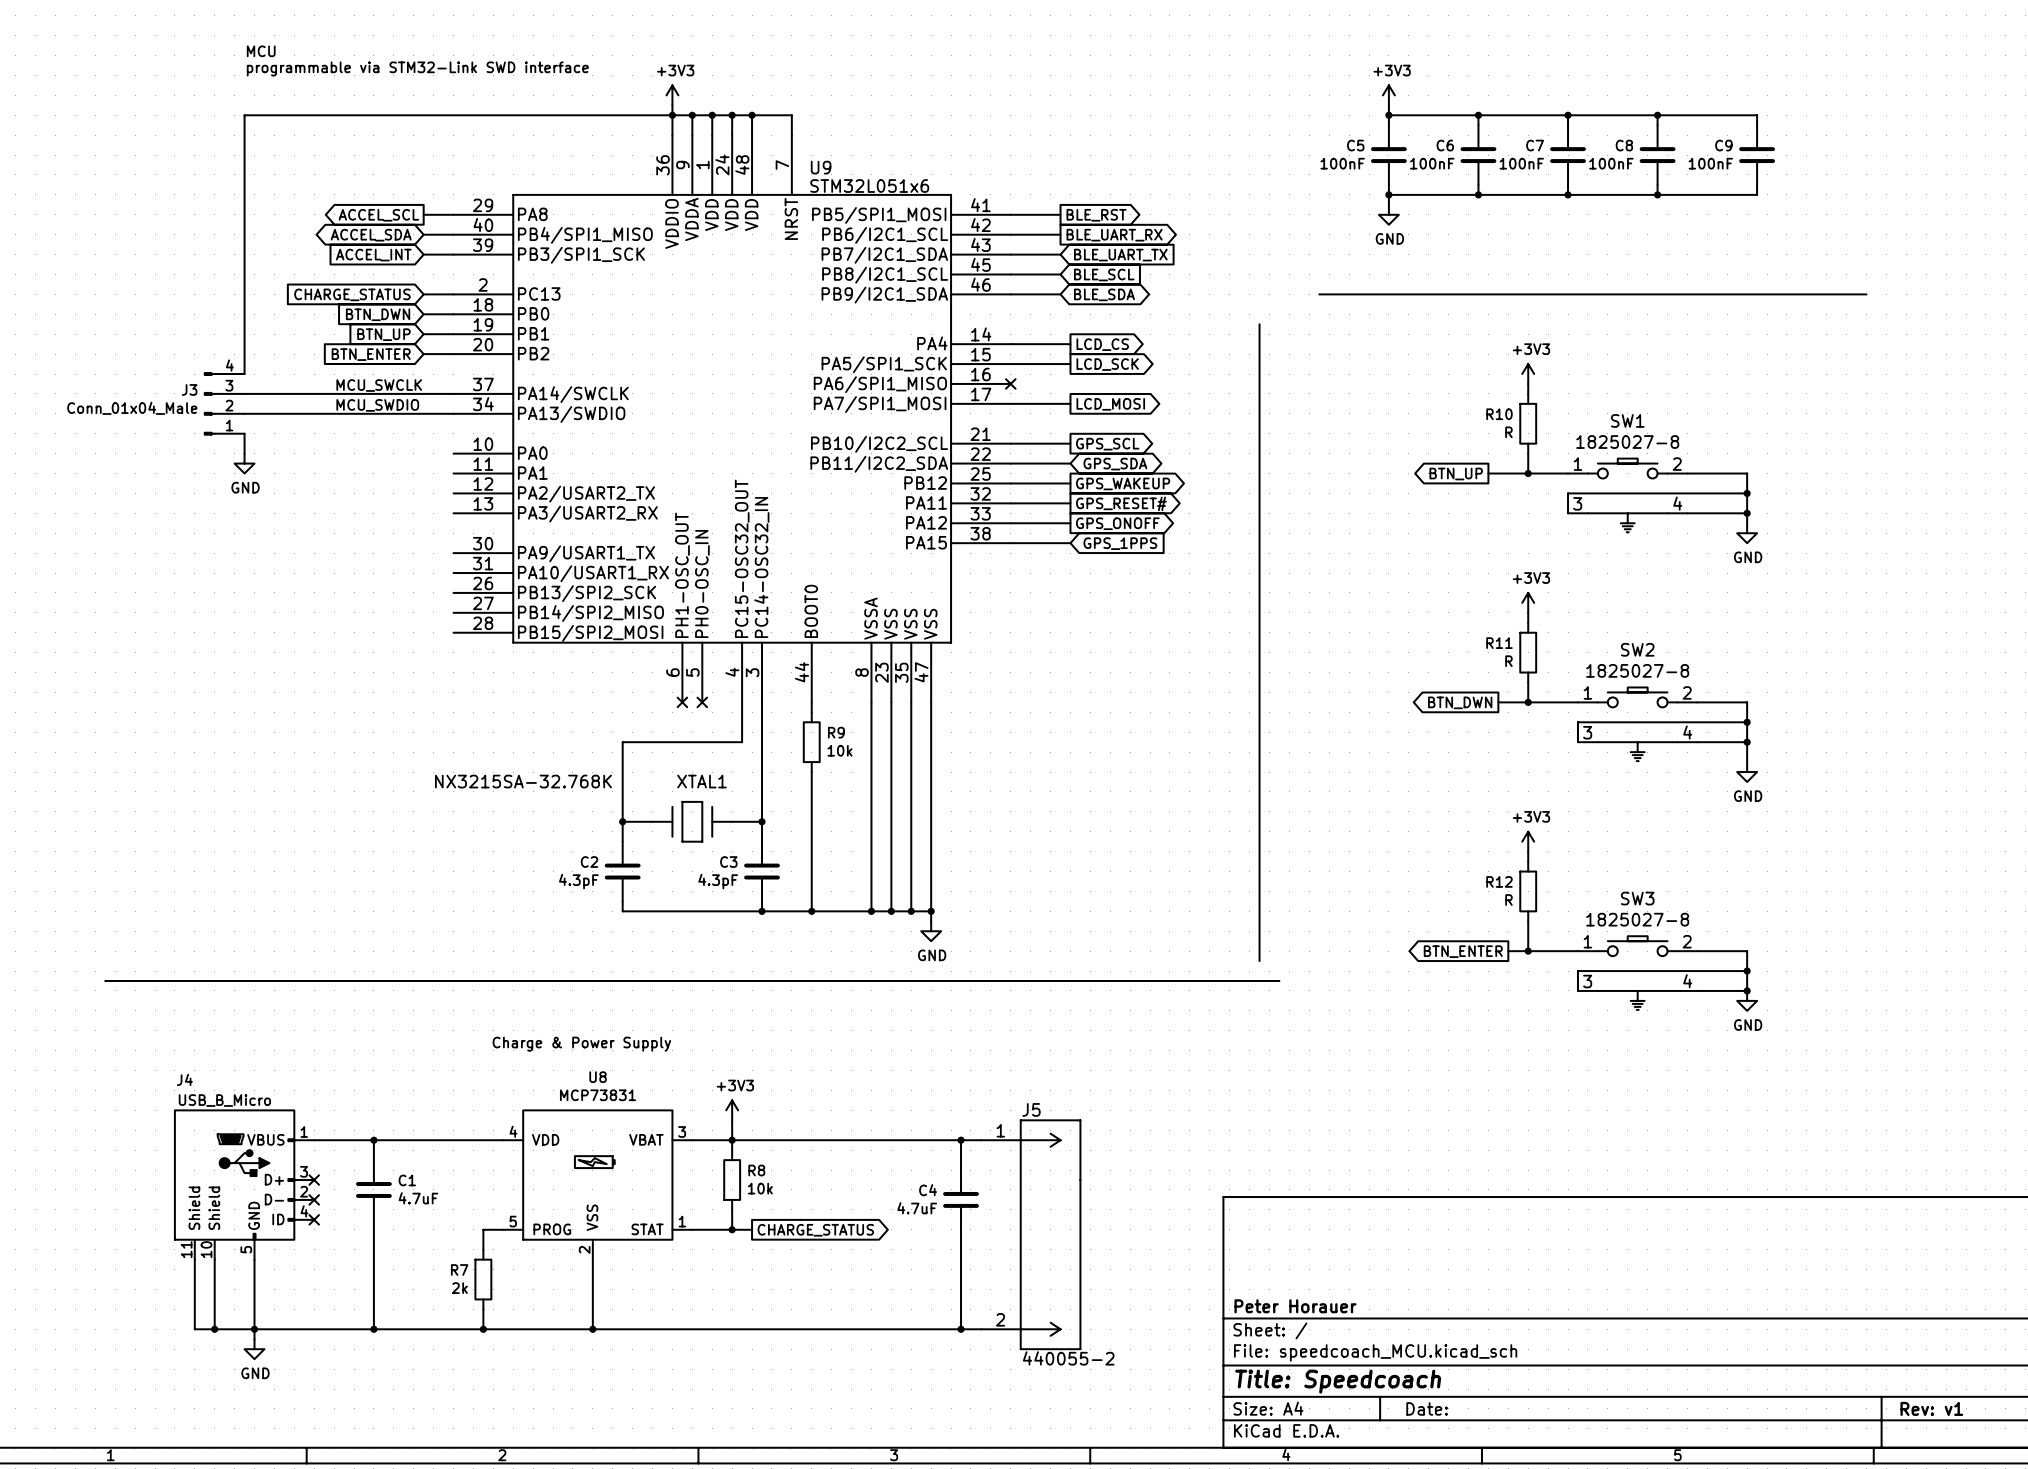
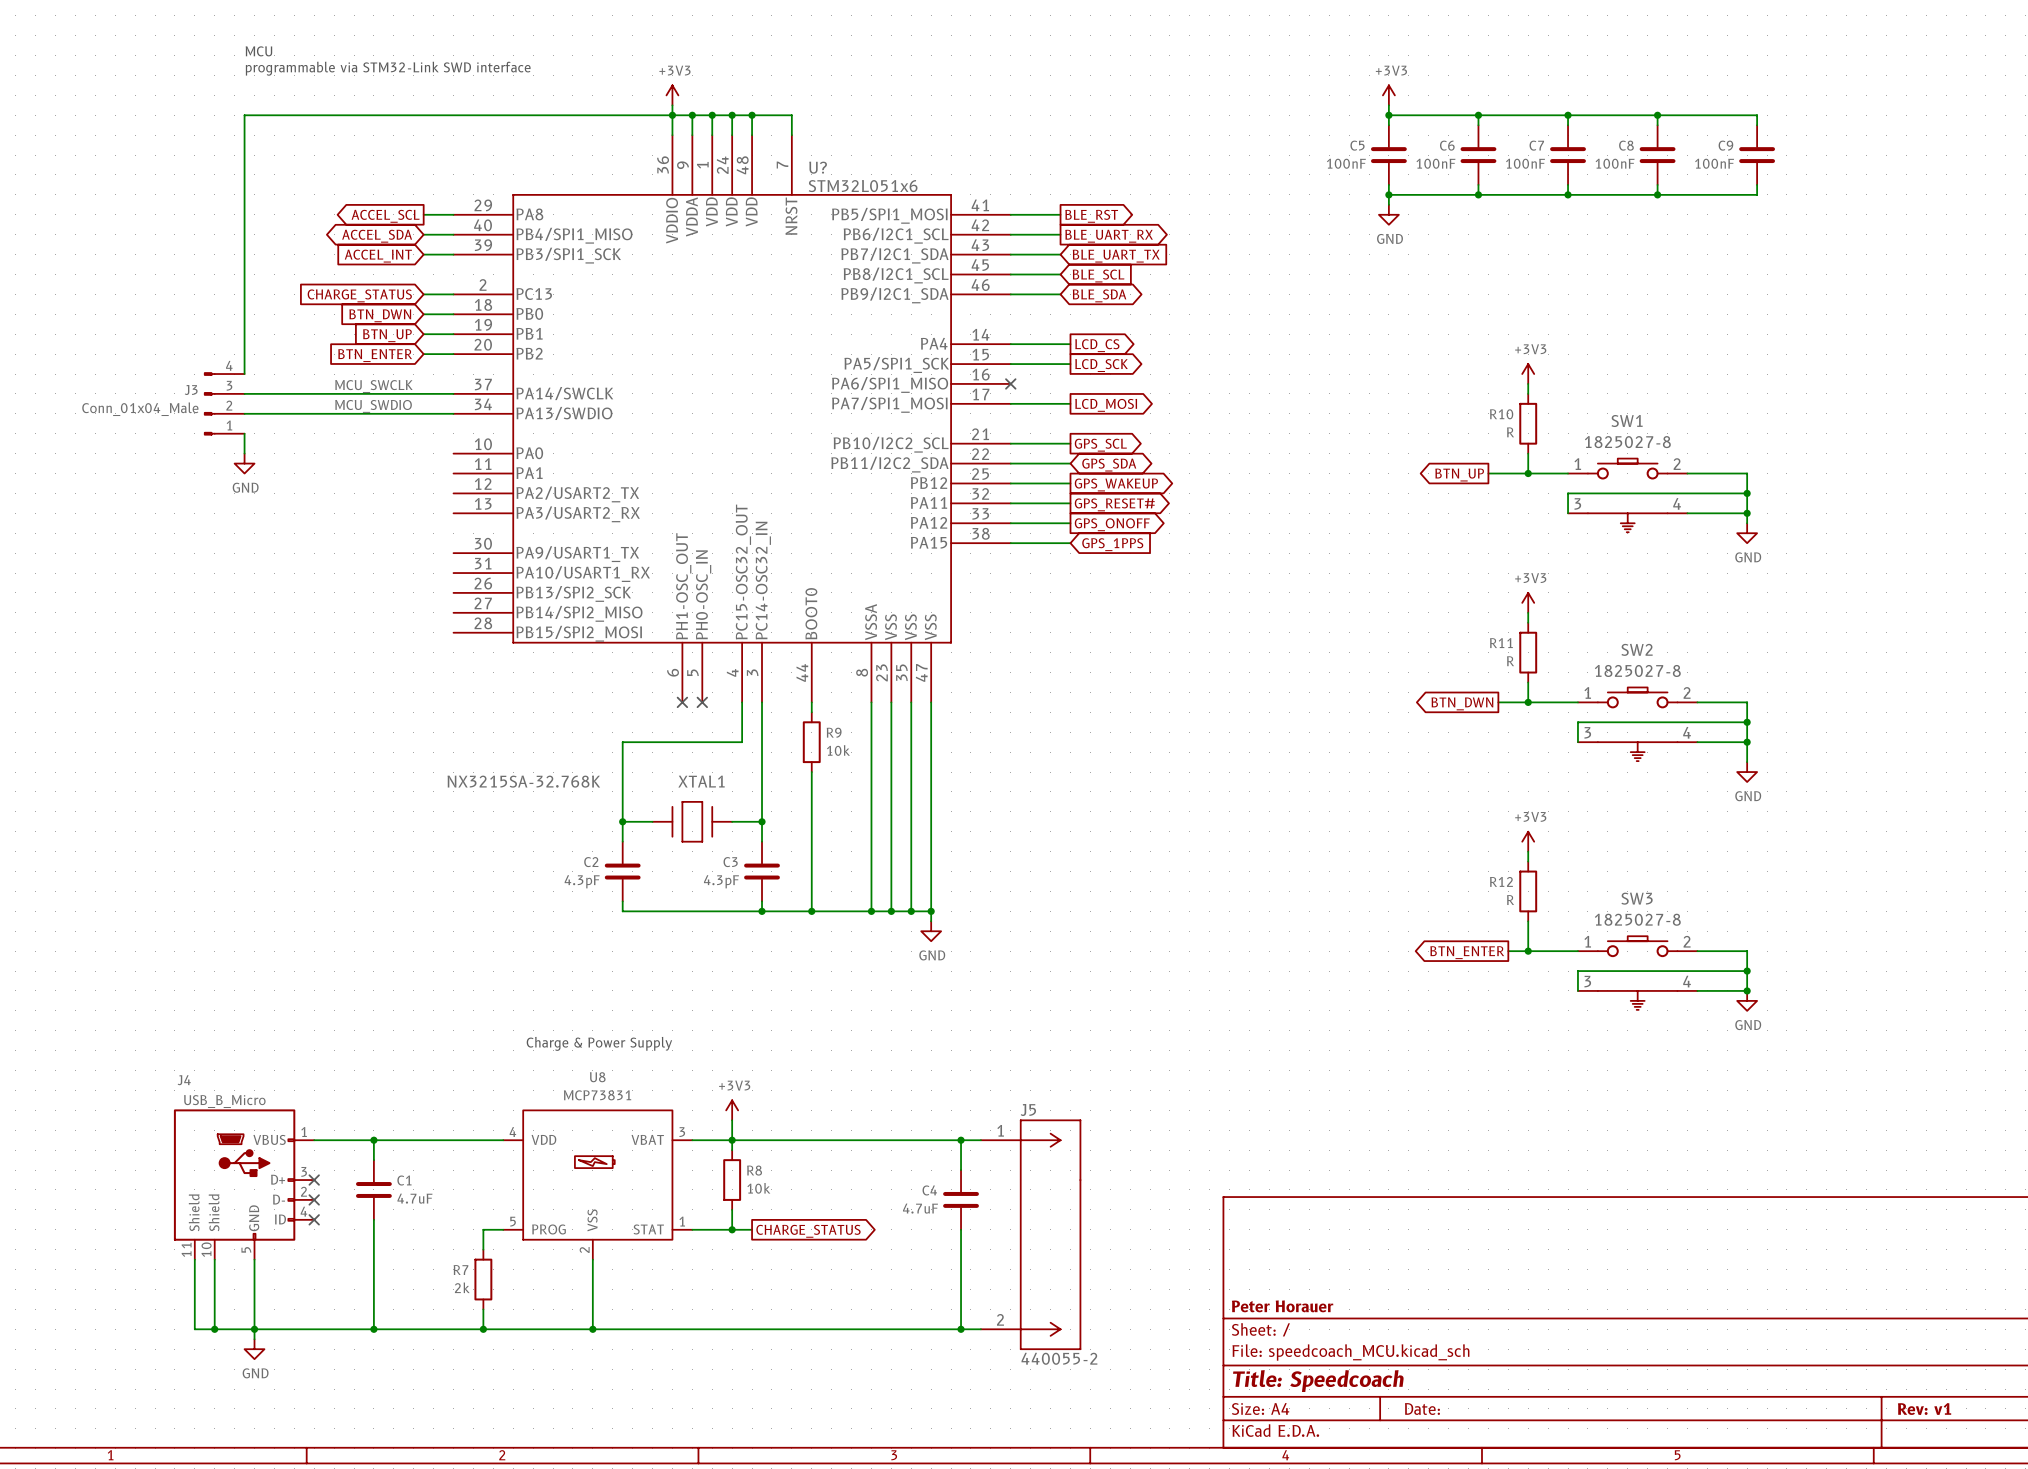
U9 name: U9 (821, 167) -> U? (818, 167)
line: (1319, 294) (1866, 294) -> none
line: (1259, 324) (1259, 961) -> none
line: (105, 981) (1279, 981) -> none

